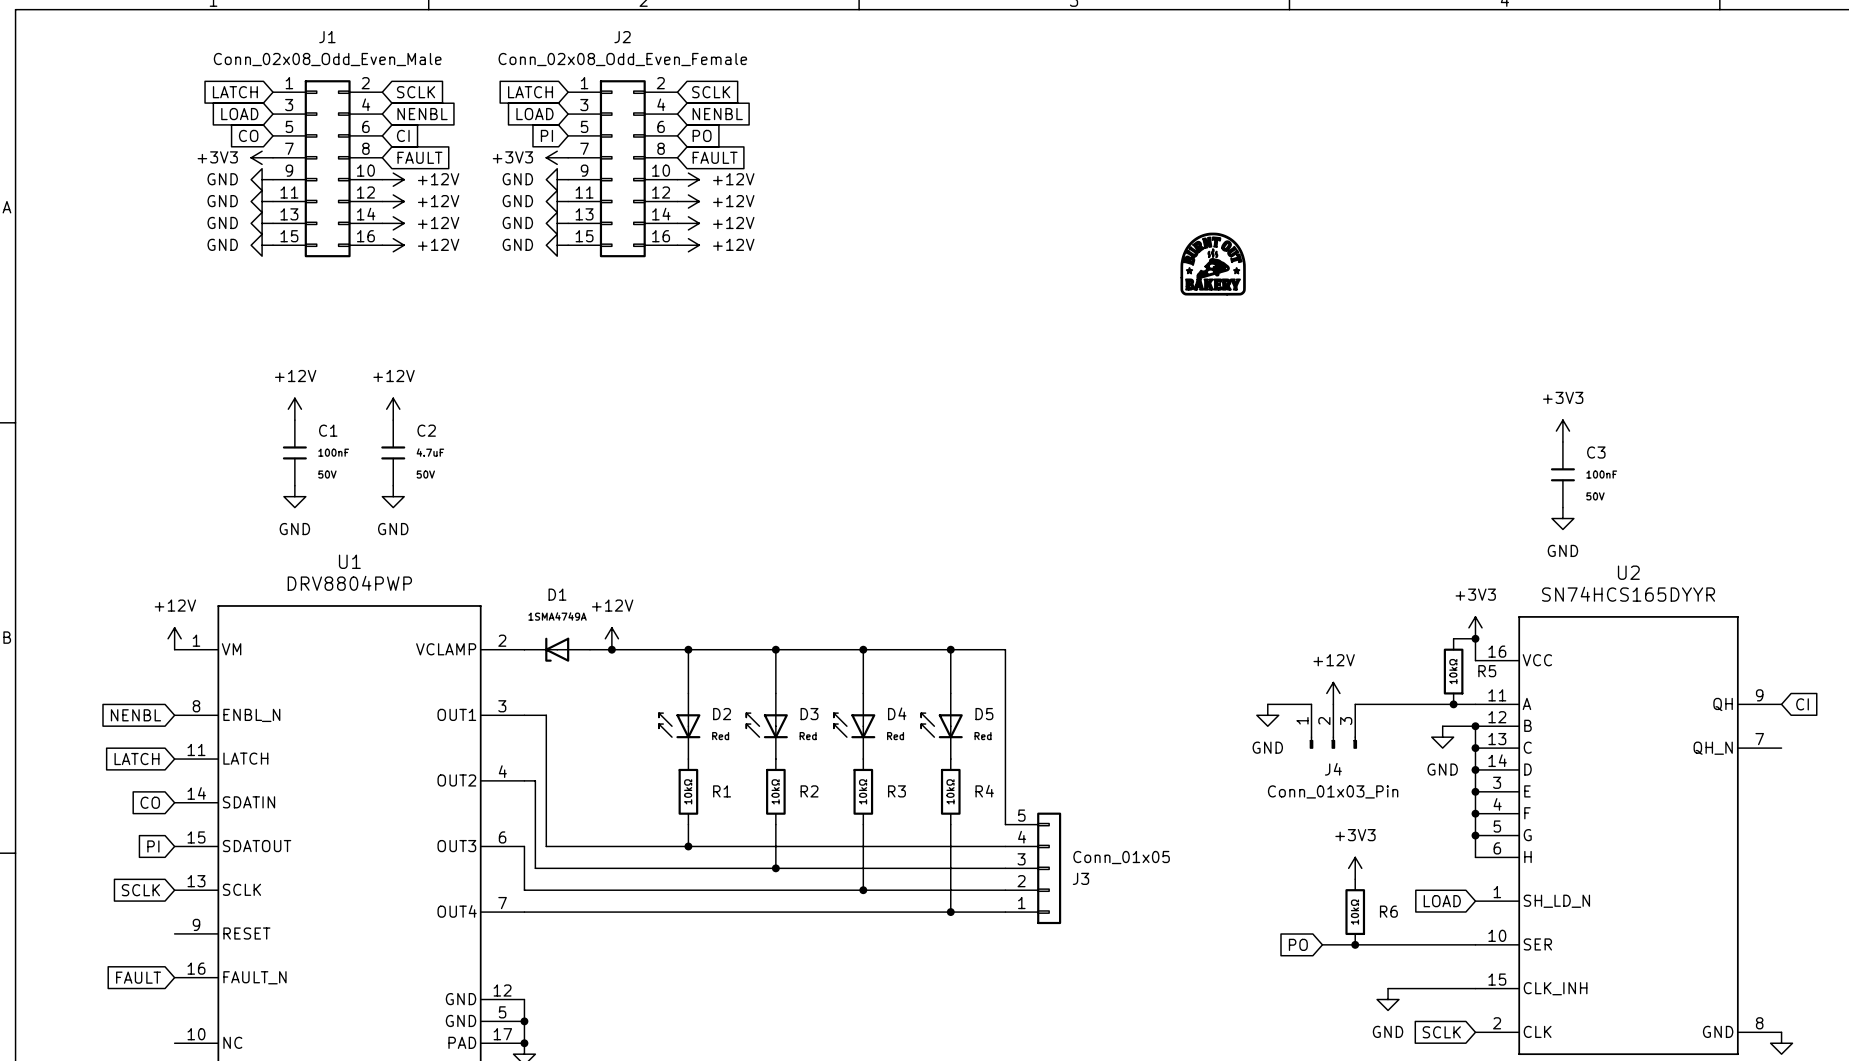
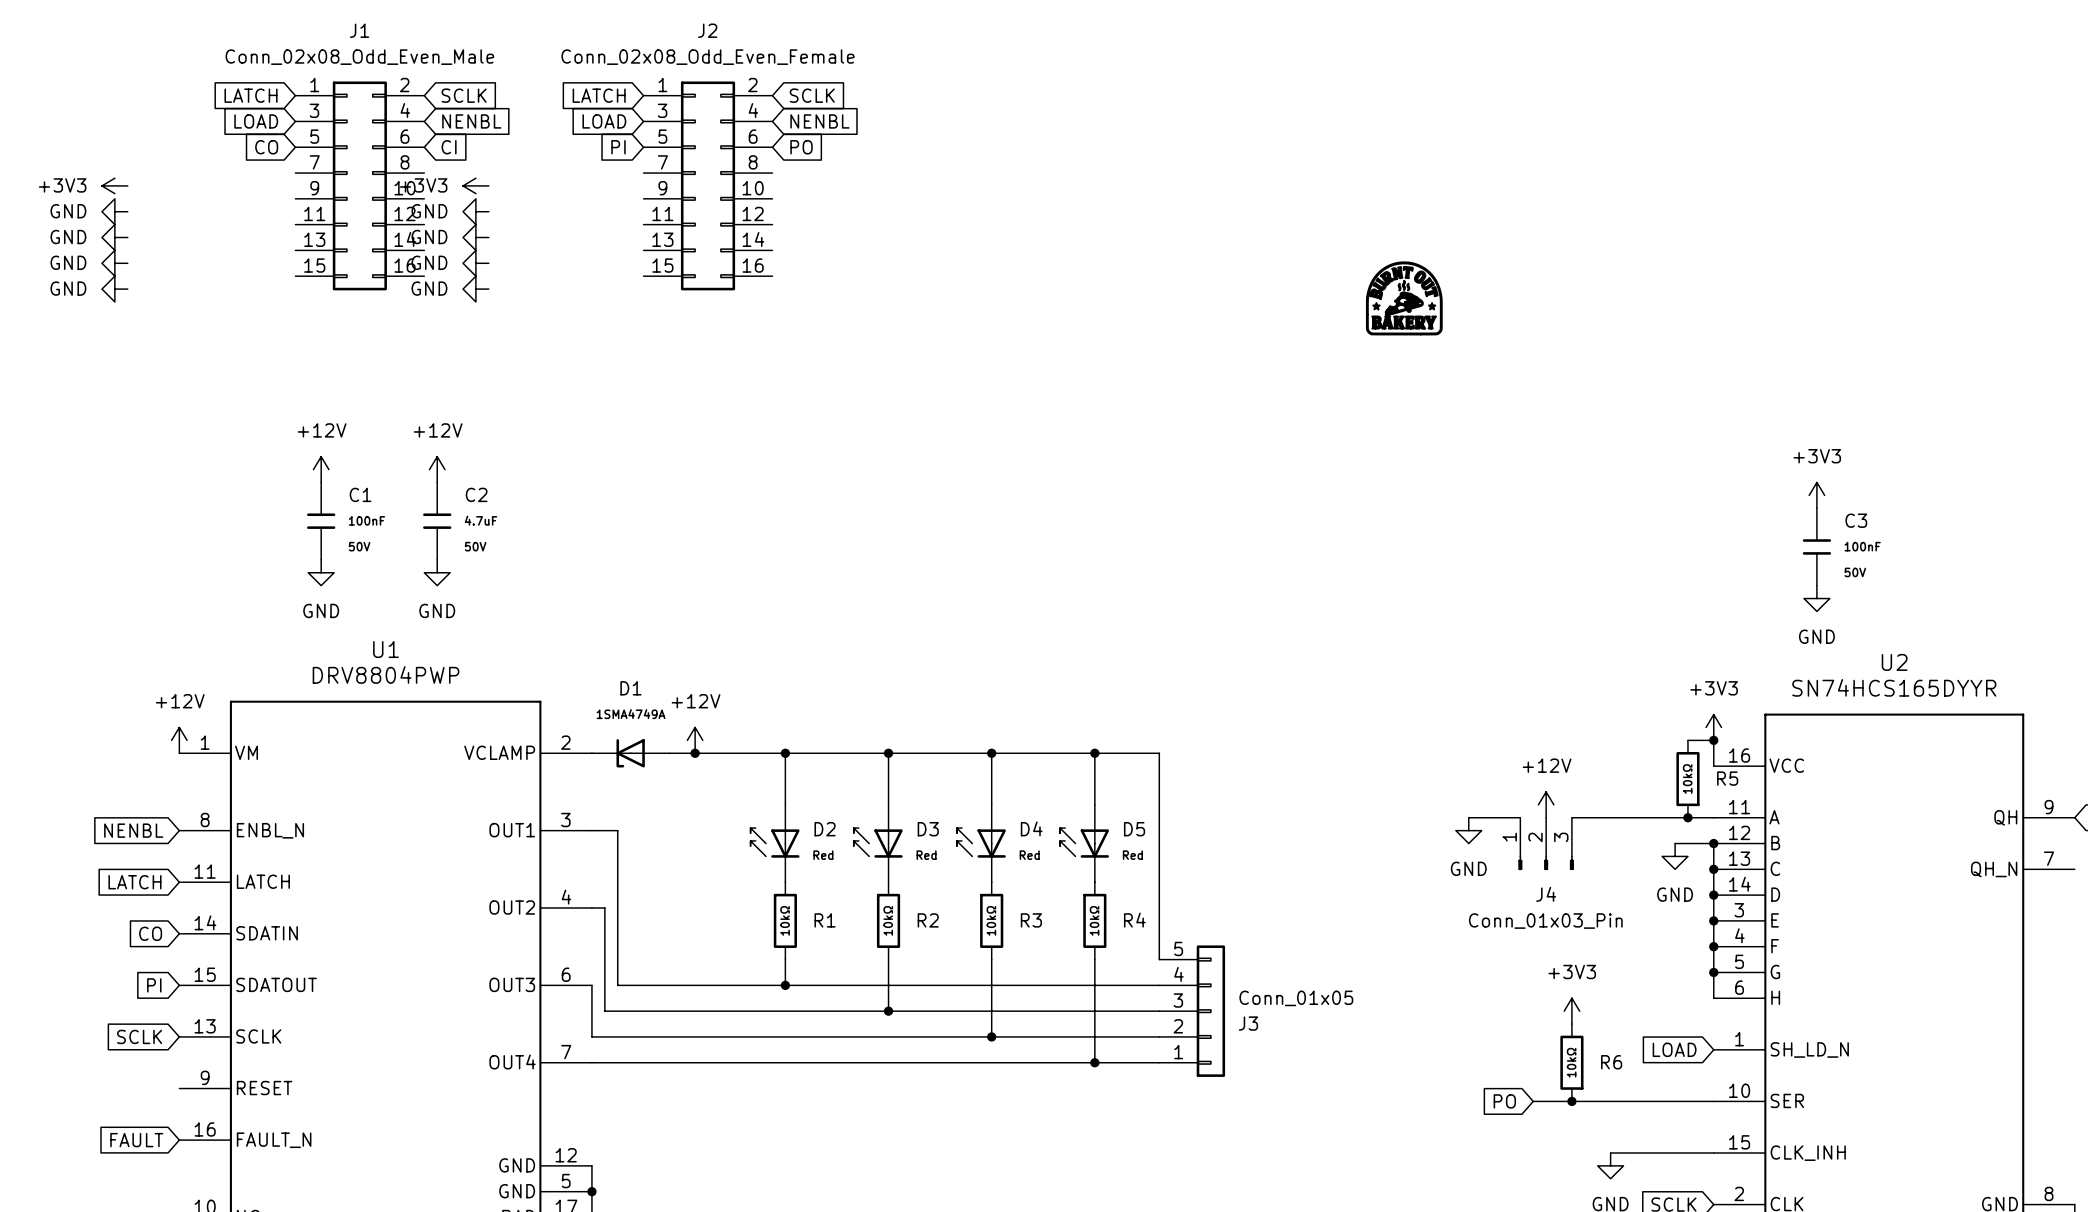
power symbol: +3V3 (262, 157) -> none
global label: FAULT (419, 157) -> none
power symbol: +3V3 (557, 157) -> none
global label: FAULT (715, 157) -> none
power symbol: none -> +3V3 (114, 185)
power symbol: none -> +3V3 (475, 185)
power symbol: GND (262, 179) -> none
power symbol: +12V (393, 179) -> none
power symbol: GND (557, 179) -> none
power symbol: +12V (688, 179) -> none
power symbol: none -> GND (114, 211)
power symbol: none -> GND (475, 211)
power symbol: GND (262, 201) -> none
power symbol: +12V (393, 201) -> none
power symbol: GND (557, 201) -> none
power symbol: +12V (688, 201) -> none
power symbol: none -> GND (114, 237)
power symbol: none -> GND (475, 237)
power symbol: GND (262, 223) -> none
power symbol: +12V (393, 223) -> none
power symbol: GND (557, 223) -> none
power symbol: +12V (688, 223) -> none
power symbol: none -> GND (114, 263)
power symbol: none -> GND (475, 263)
power symbol: GND (262, 245) -> none
power symbol: +12V (393, 245) -> none
power symbol: GND (557, 245) -> none
power symbol: +12V (688, 245) -> none
power symbol: none -> GND (114, 289)
power symbol: none -> GND (475, 289)

